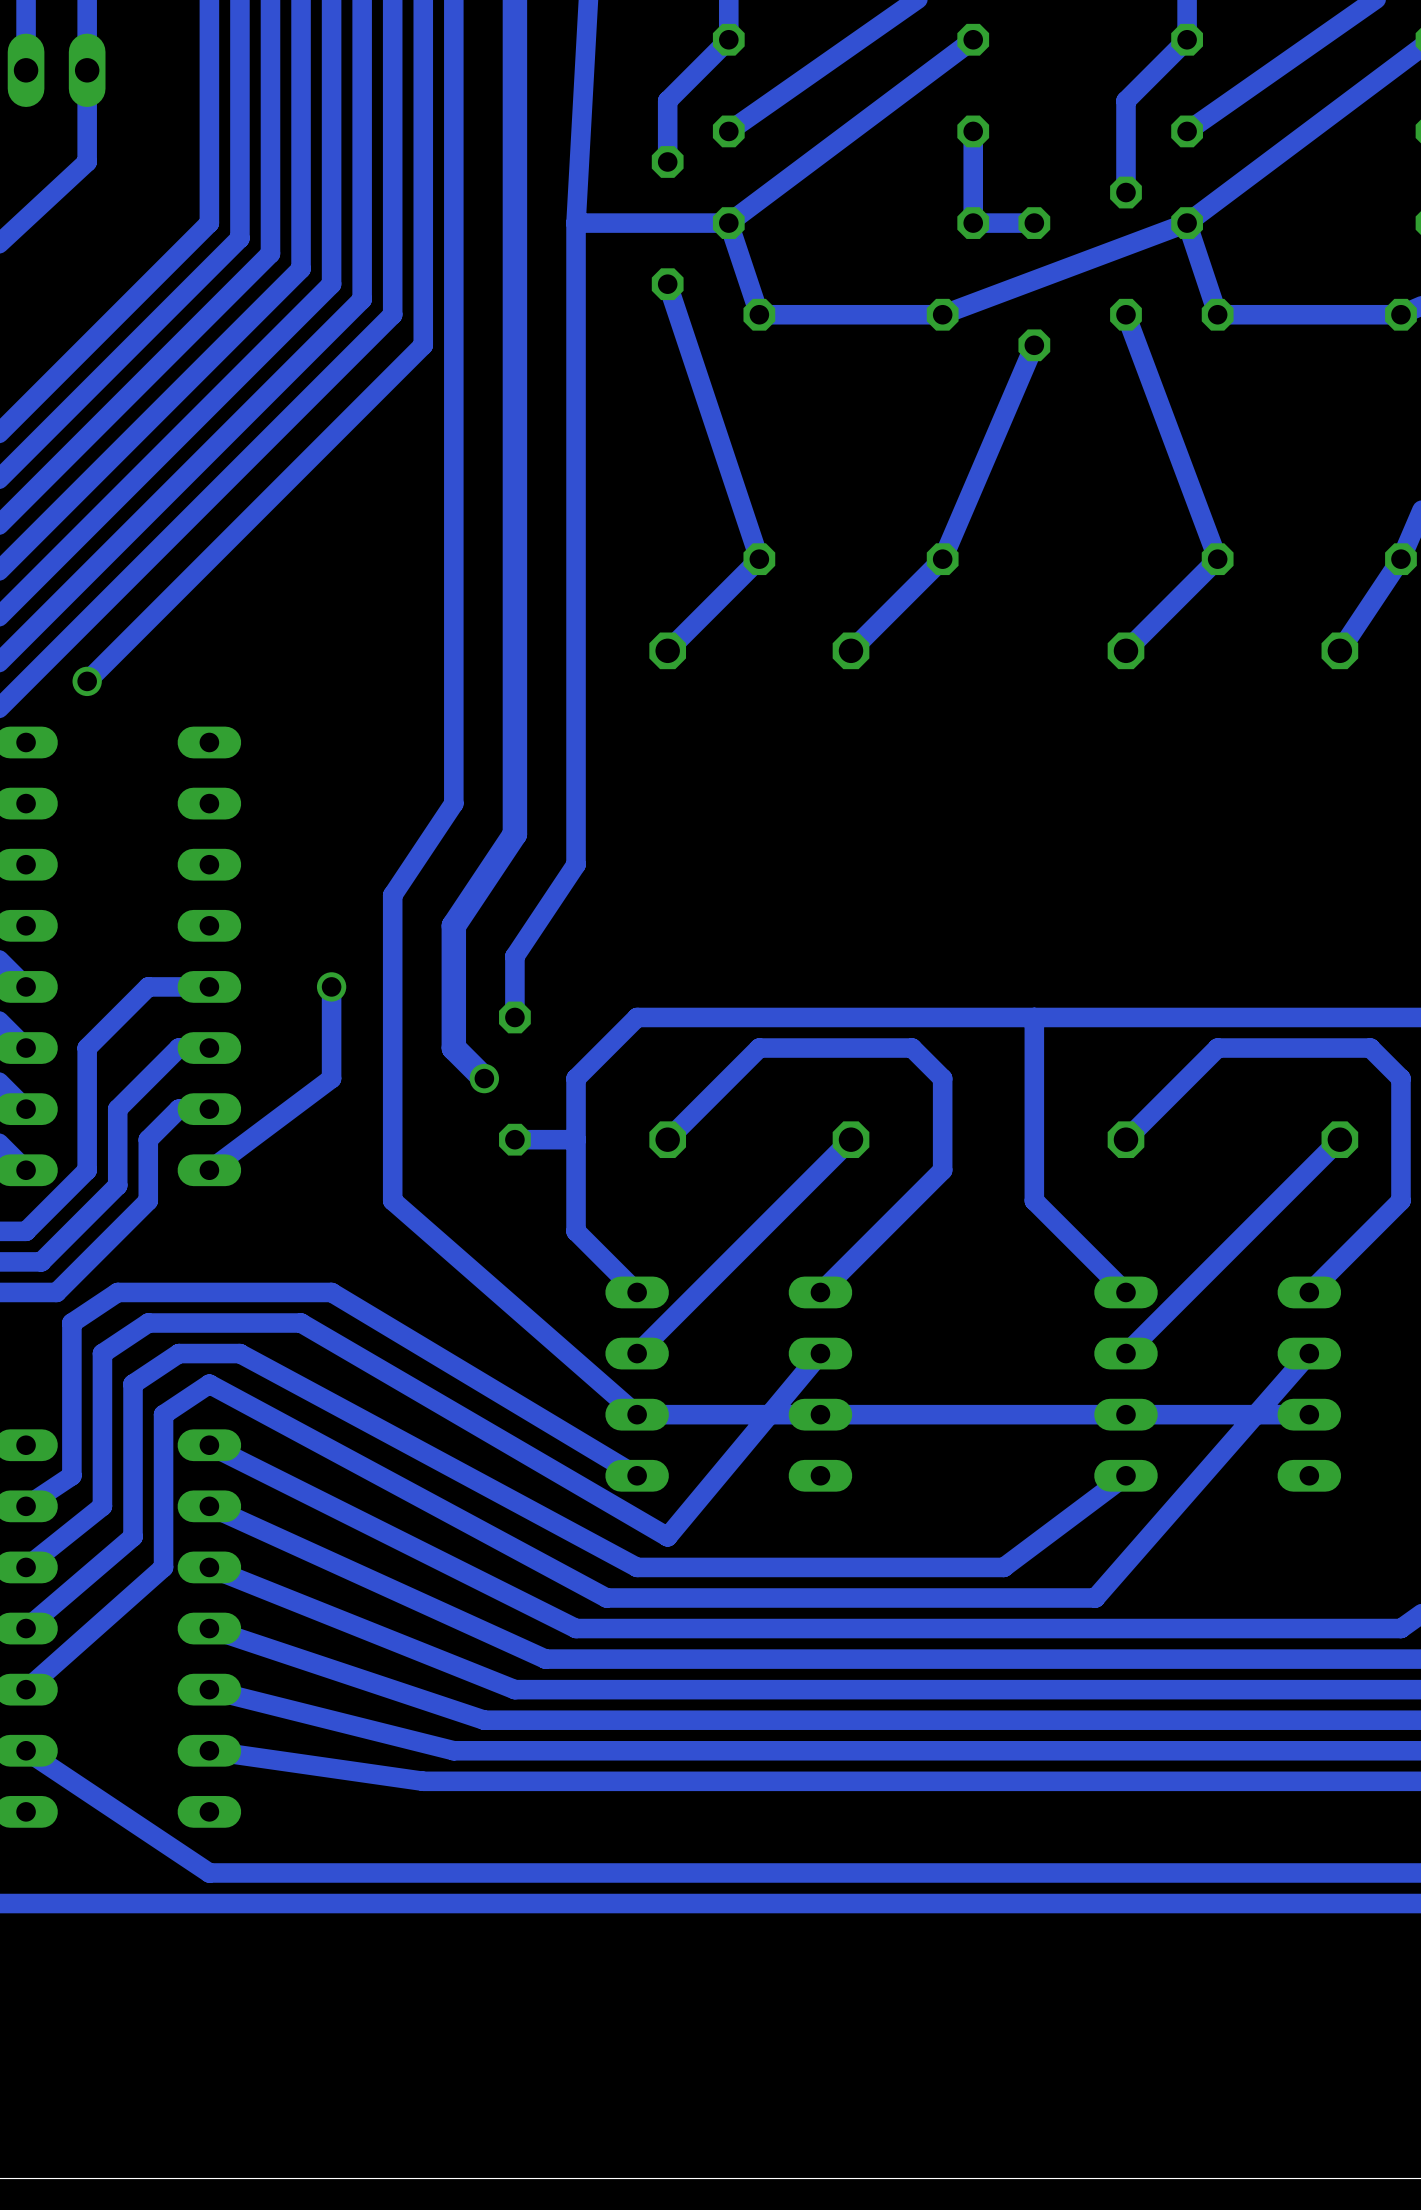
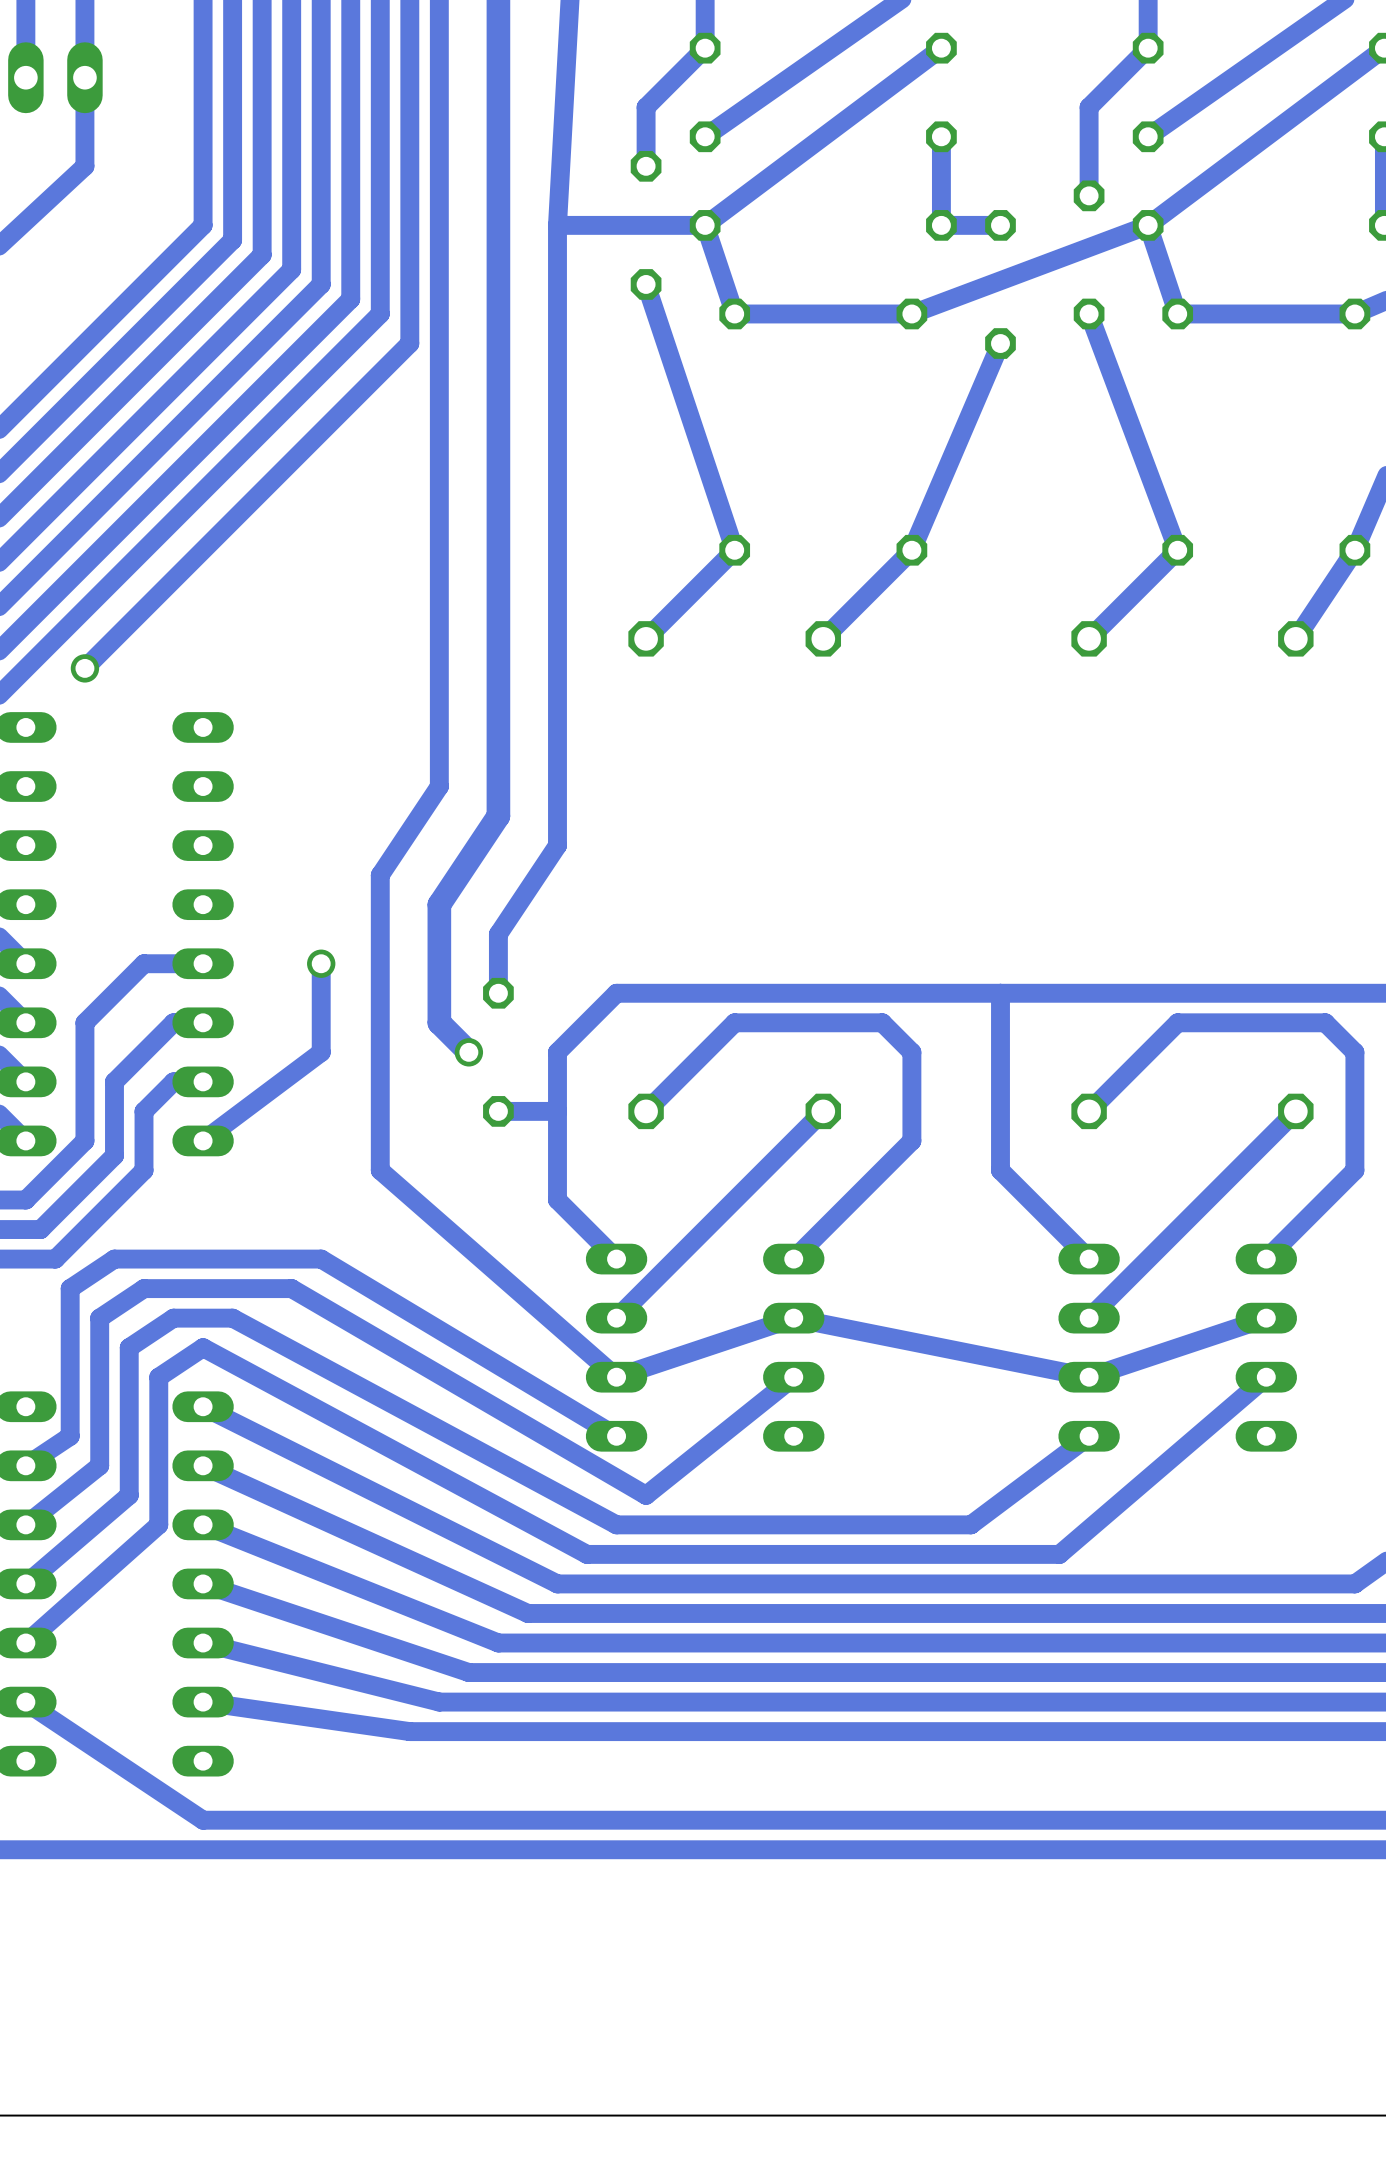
track: (820, 1353) (667, 1536) -> (793, 1377) (646, 1495)
track: (1309, 1353) (1095, 1597) -> (1266, 1377) (1059, 1554)
track: (1309, 1414) (637, 1414) -> (1266, 1318) (1089, 1377) (793, 1318) (616, 1377)

